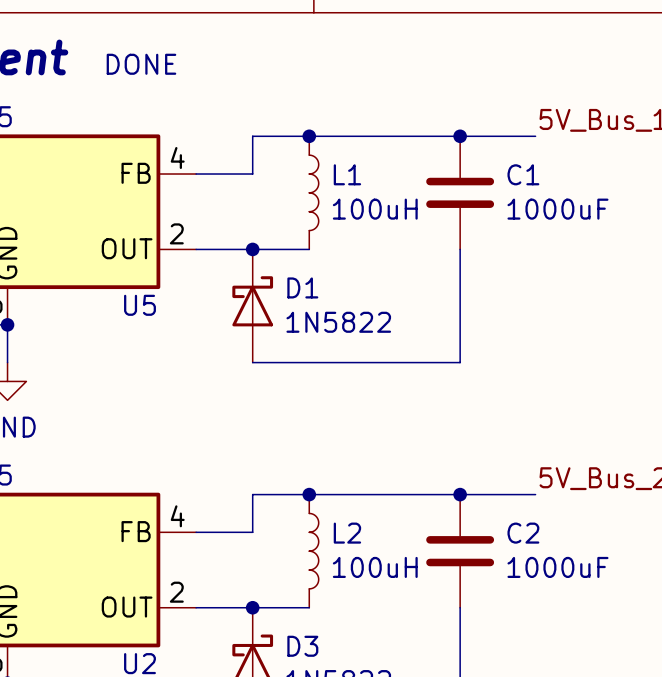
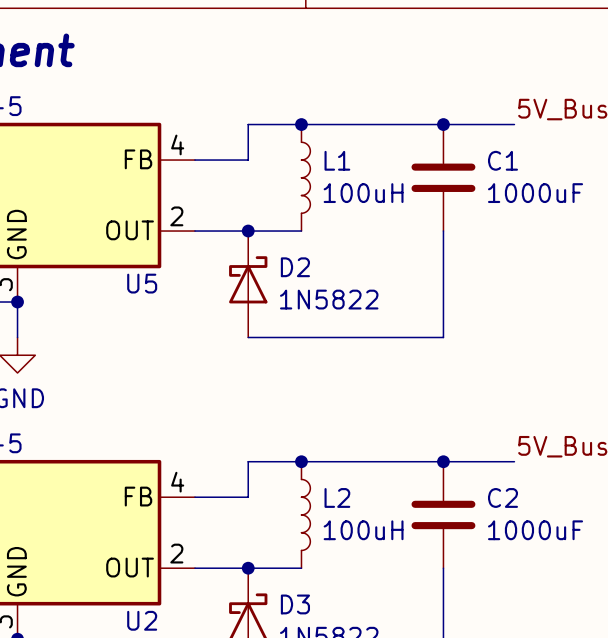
text: DONE (141, 64) -> none
D1 name: D1 (302, 287) -> D2 (295, 267)

